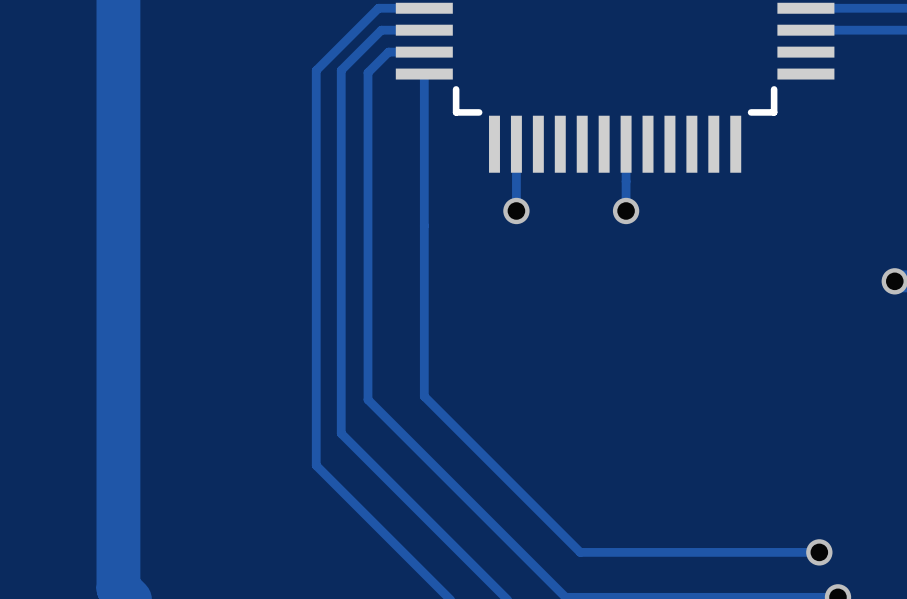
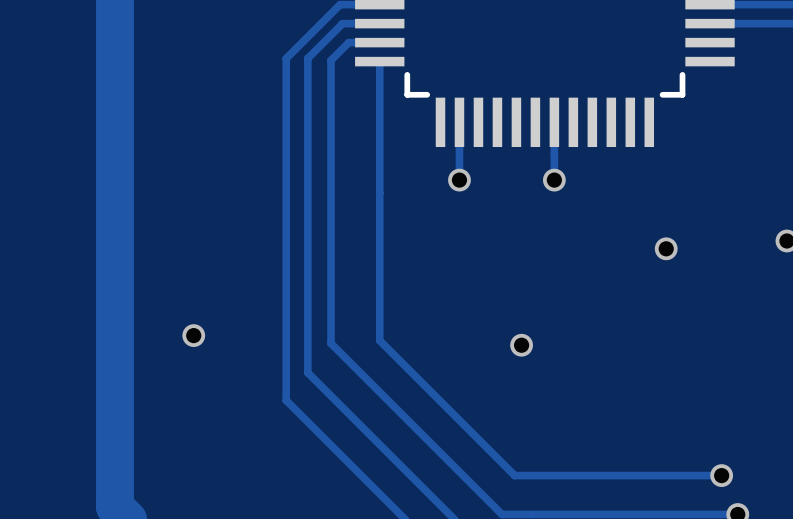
via: none -> (666, 248)
via: none -> (193, 335)
via: none -> (521, 345)

